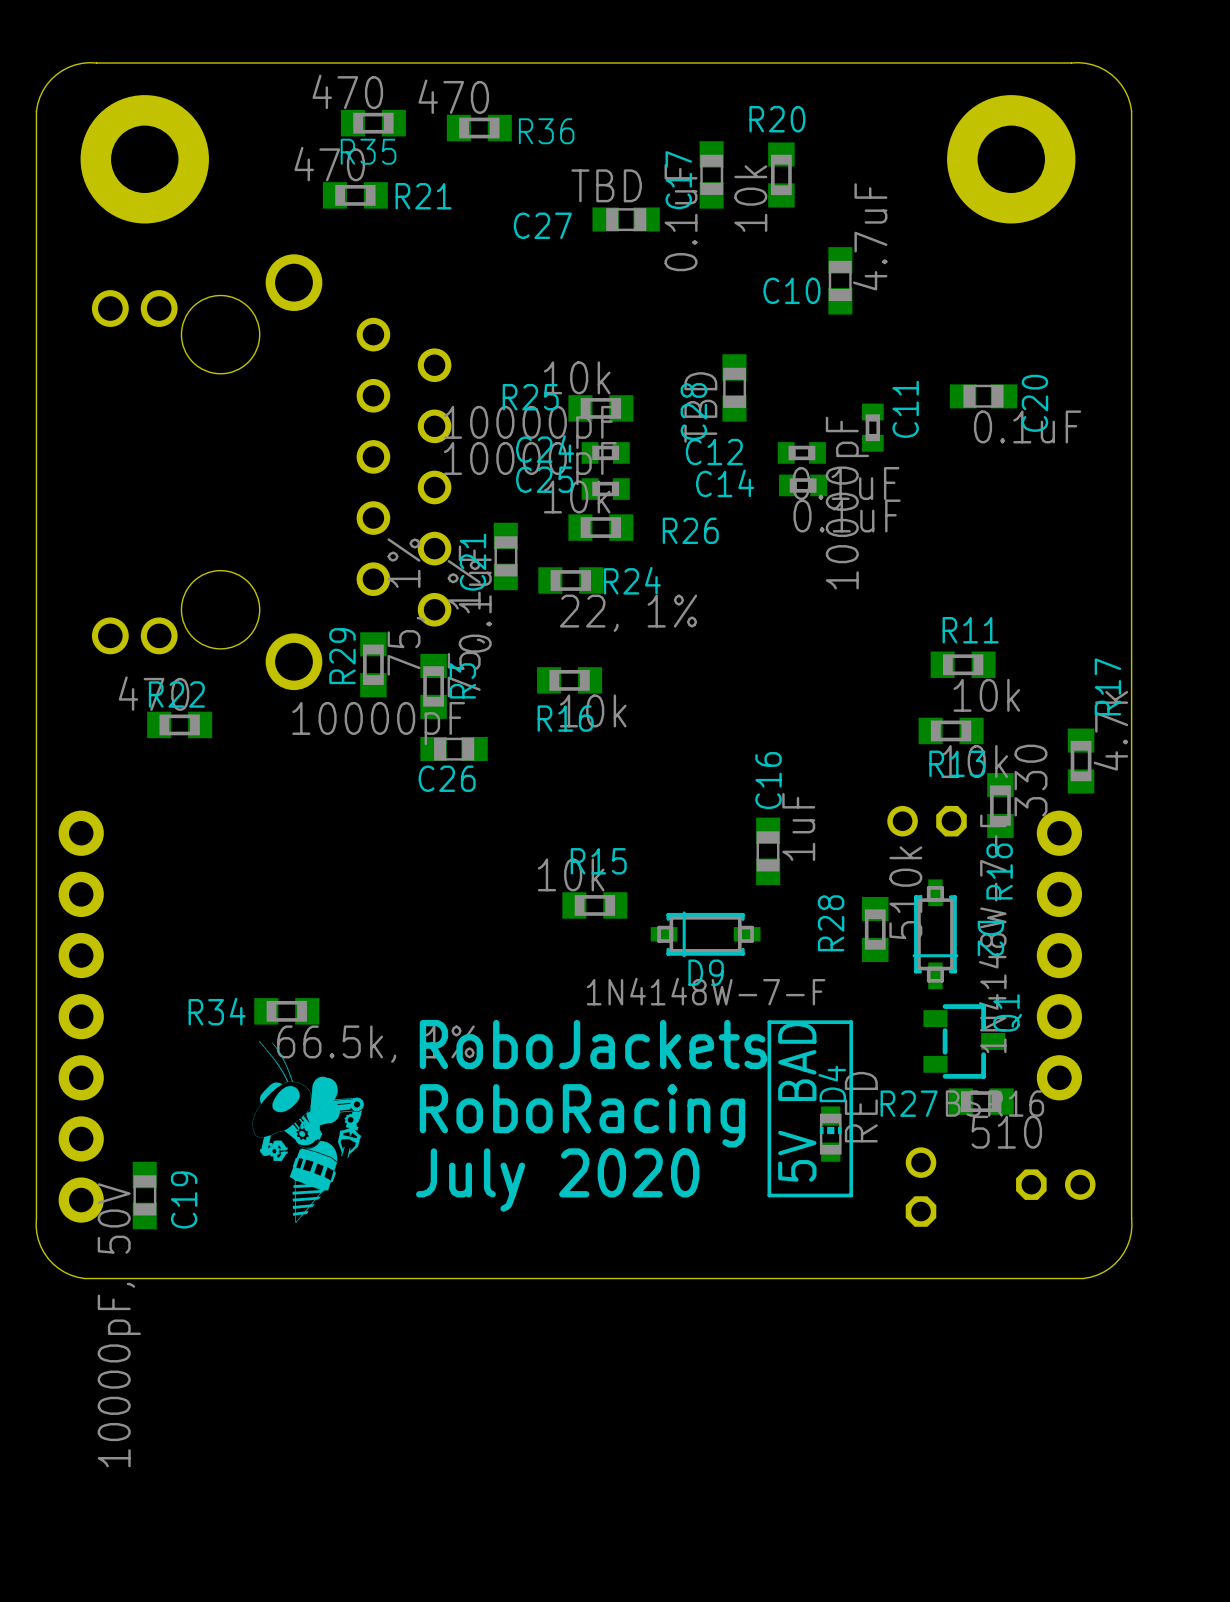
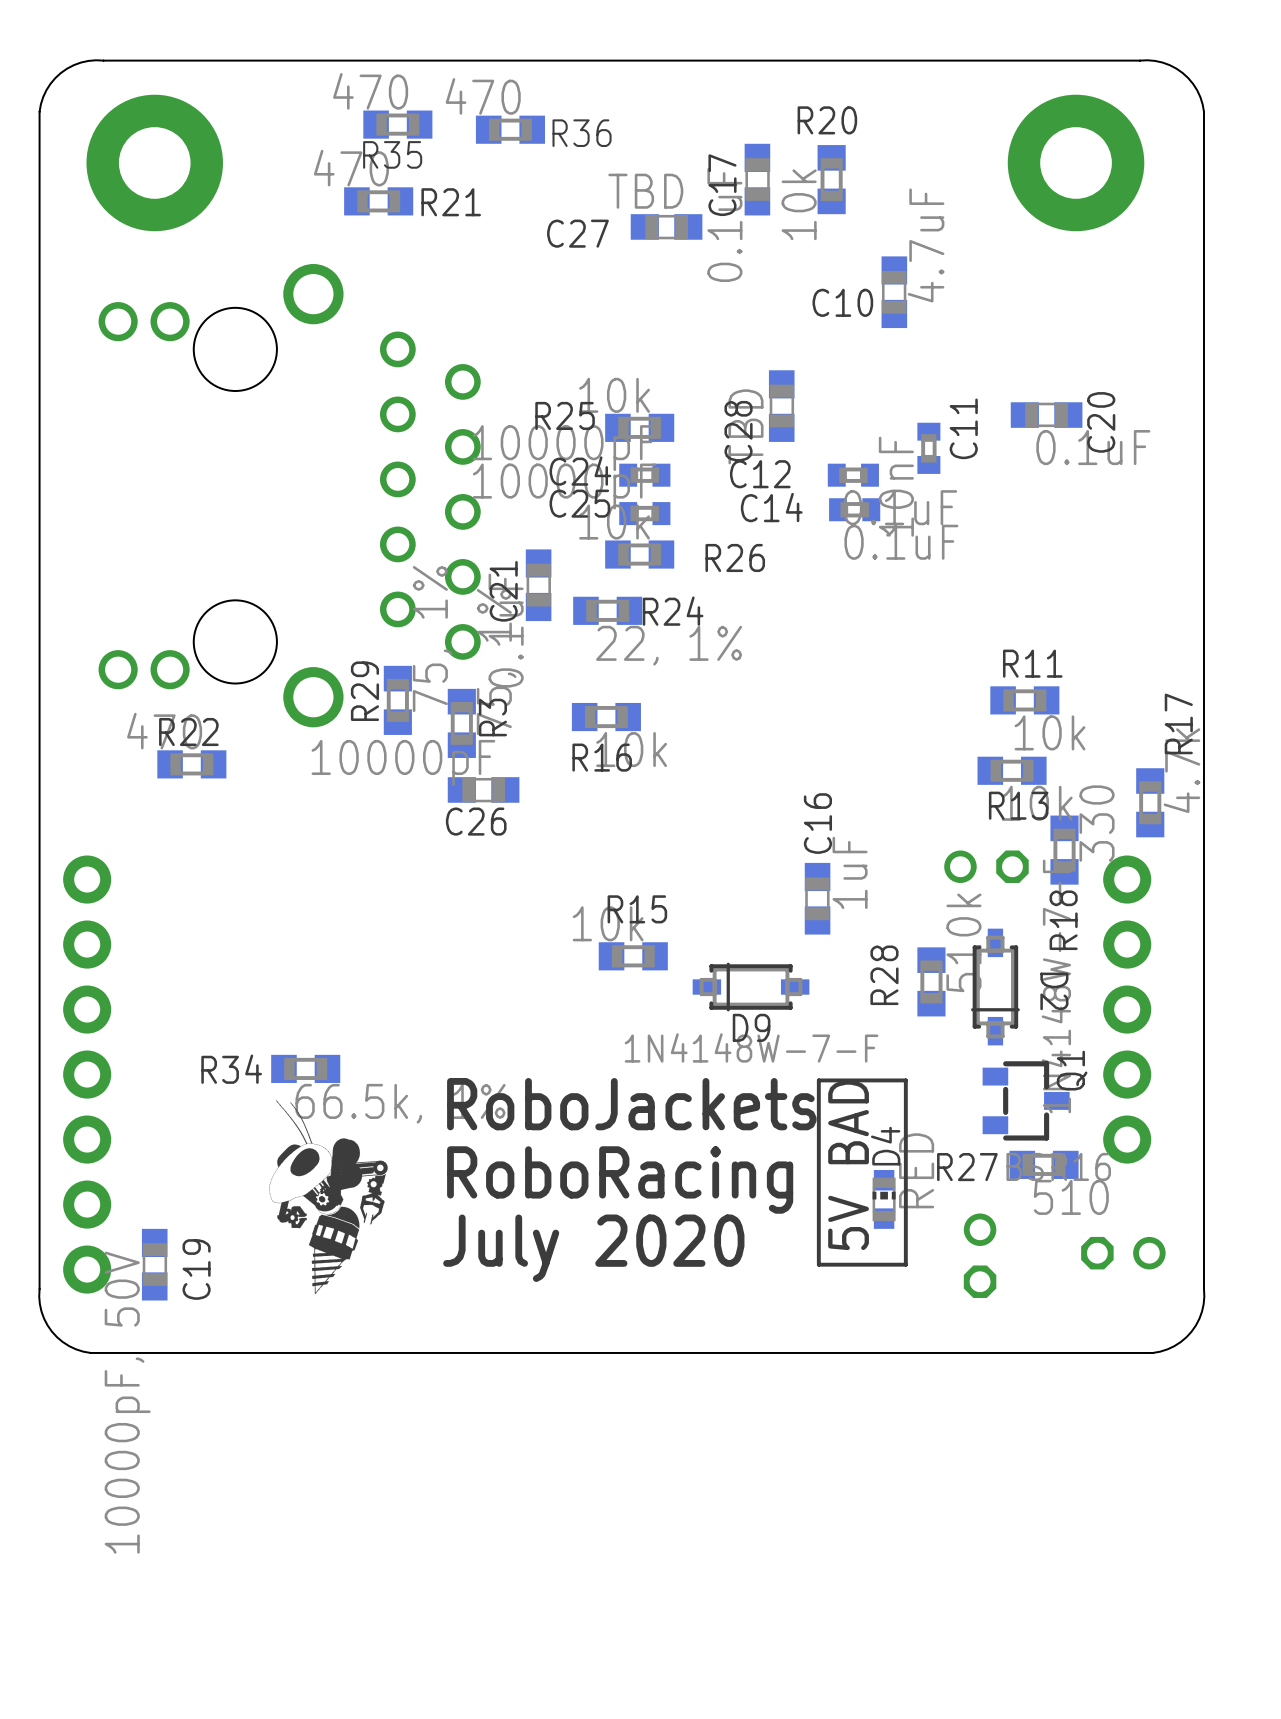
C11 value: 10000pF (847, 503) -> 10nF (896, 486)

